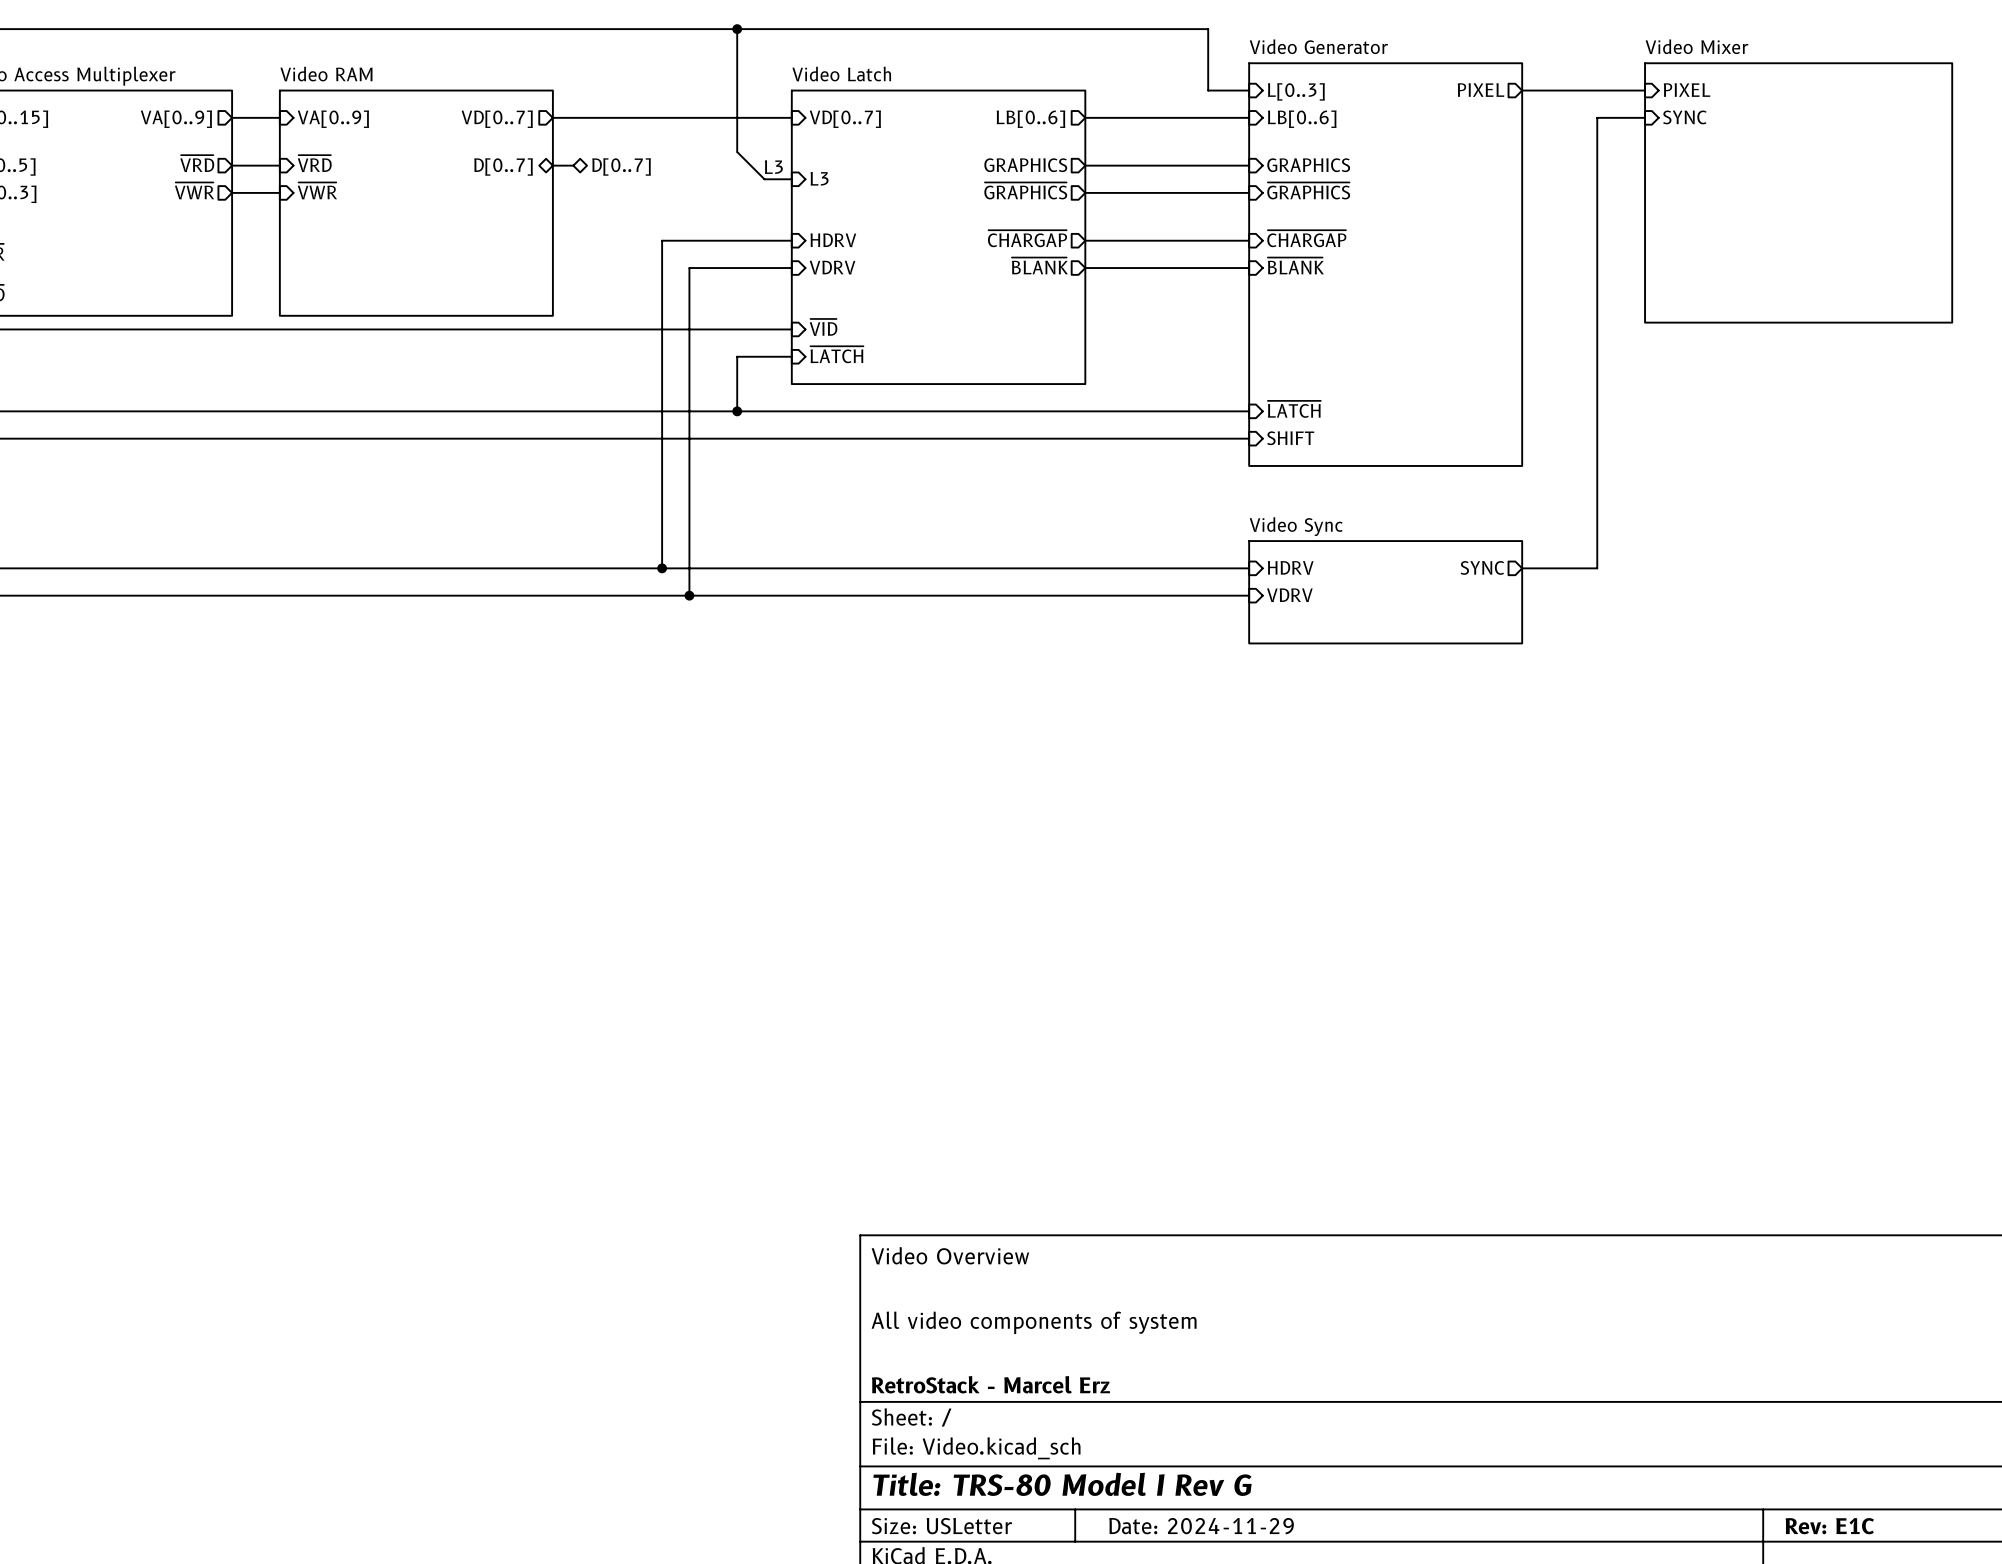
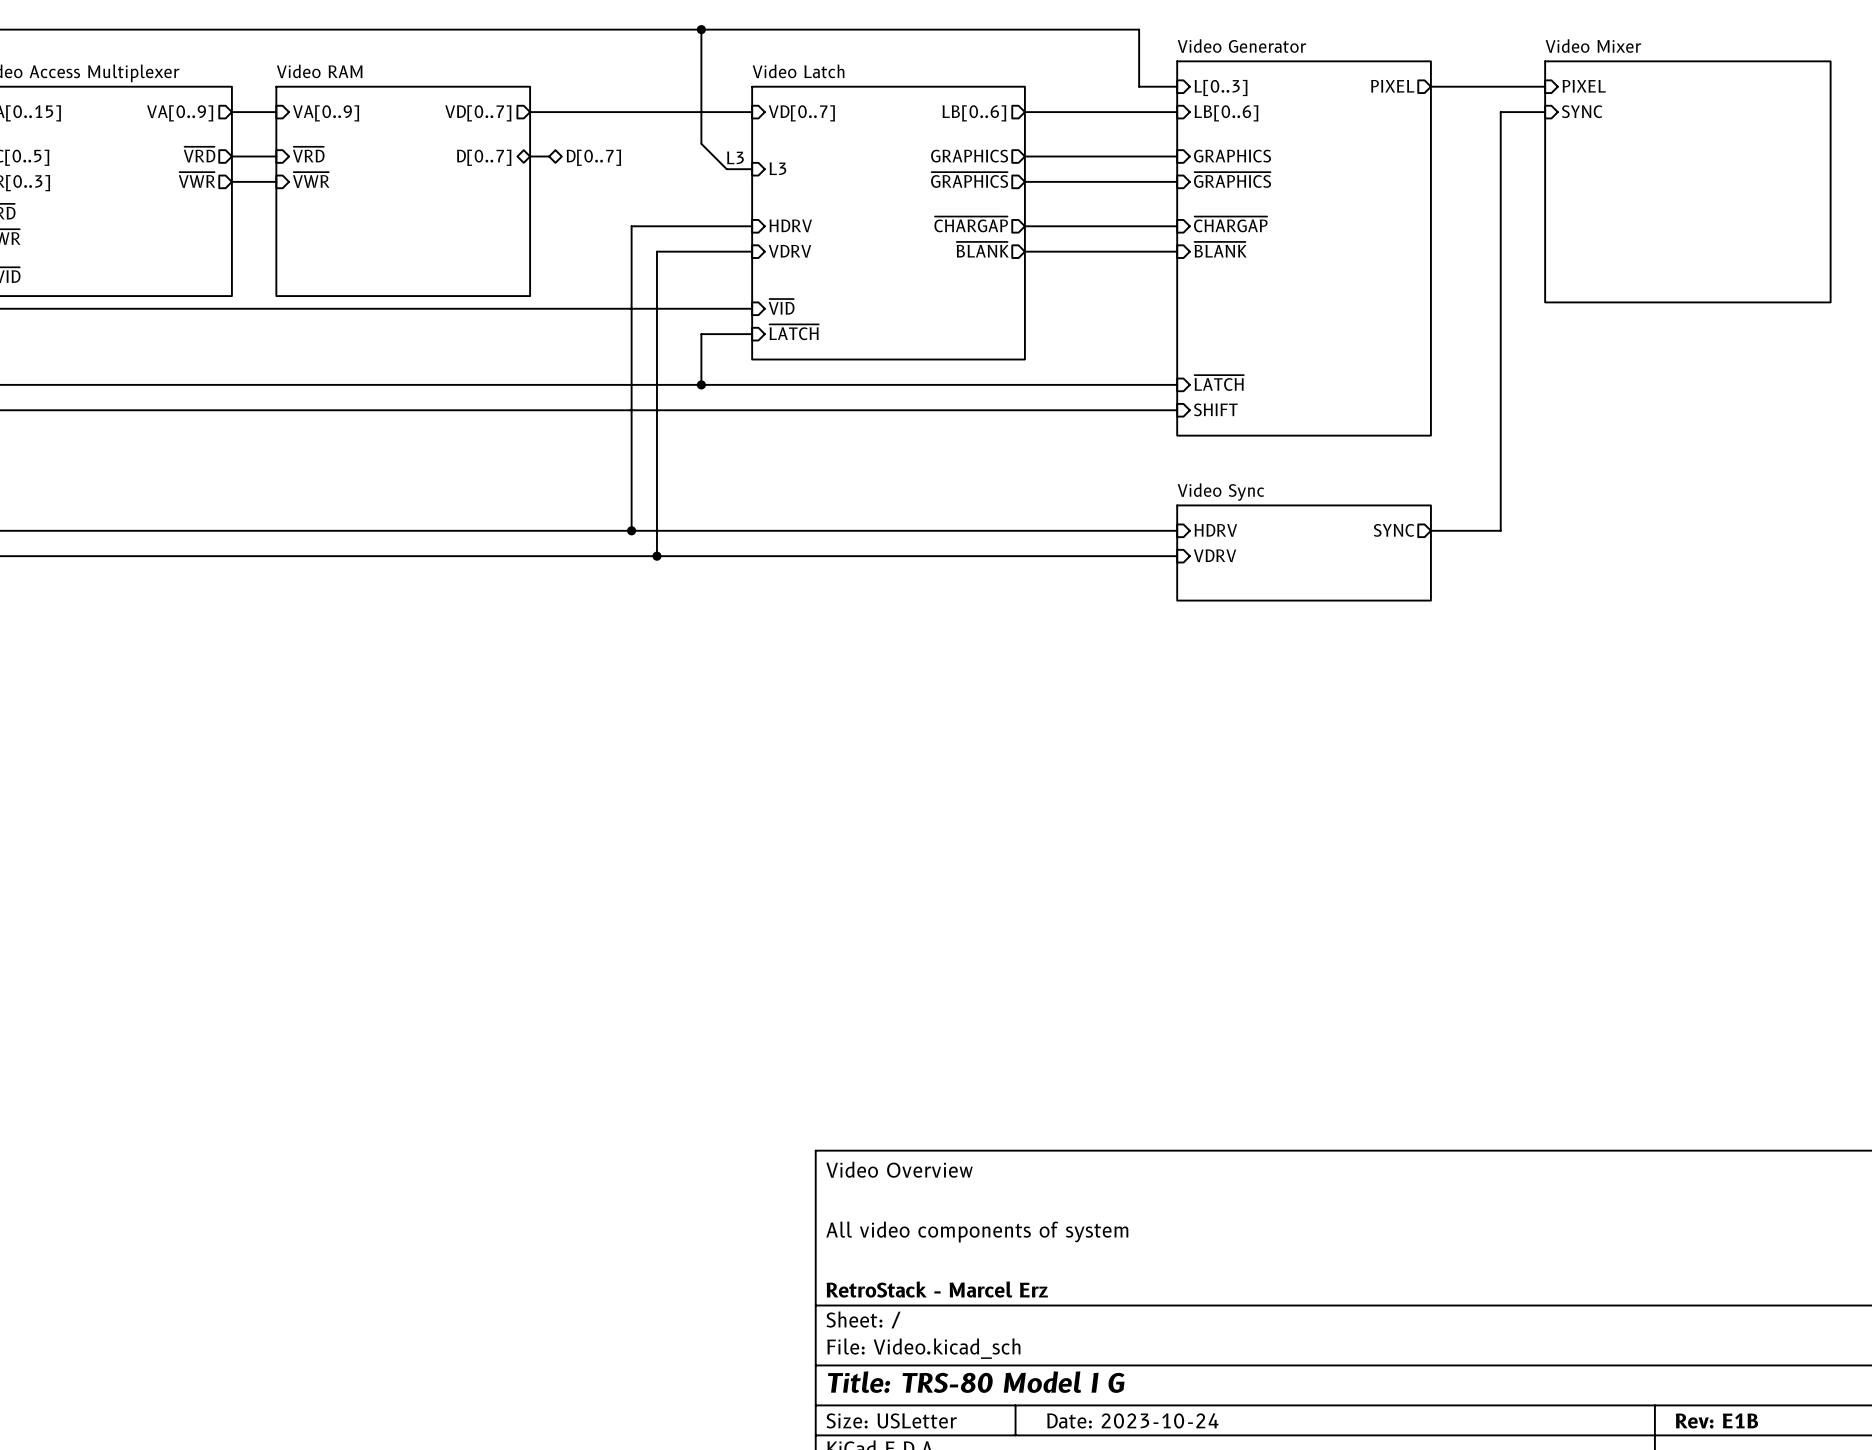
title block: Title: TRS-80 Model I Rev G (1062, 1484) -> Title: TRS-80 Model I G (976, 1382)
title block: Date: 2024-11-29 (1201, 1526) -> Date: 2023-10-24 (1132, 1420)
title block: Rev: E1C (1829, 1526) -> Rev: E1B (1716, 1420)

